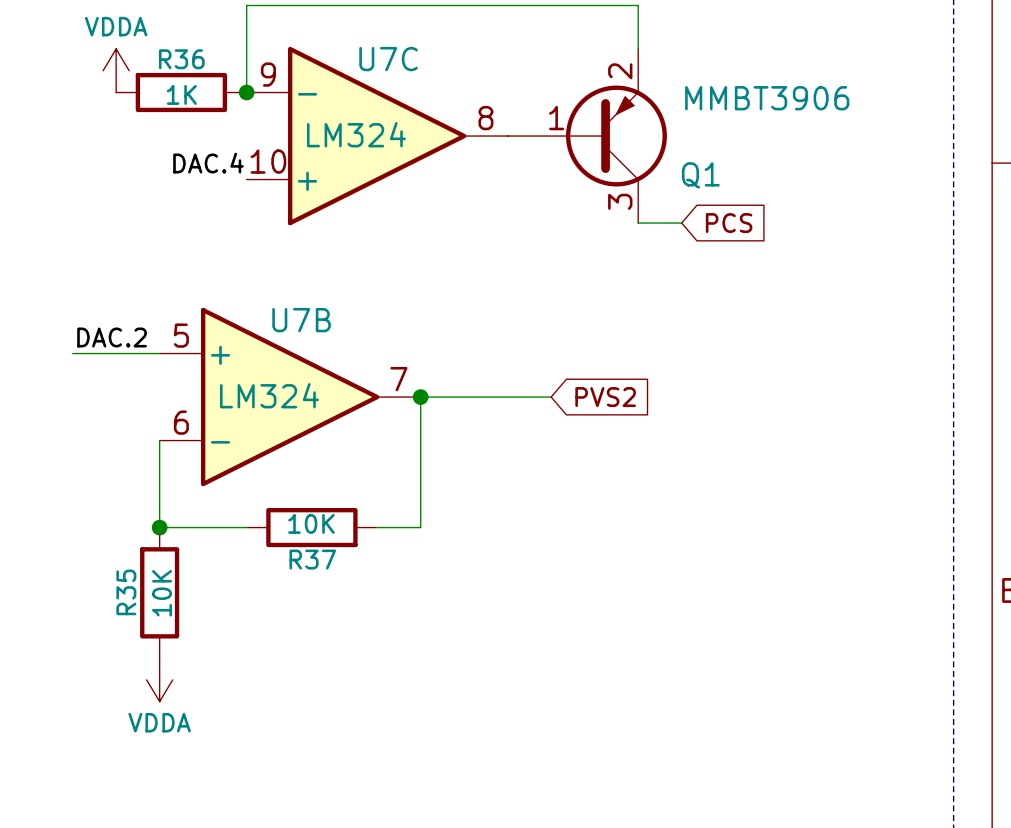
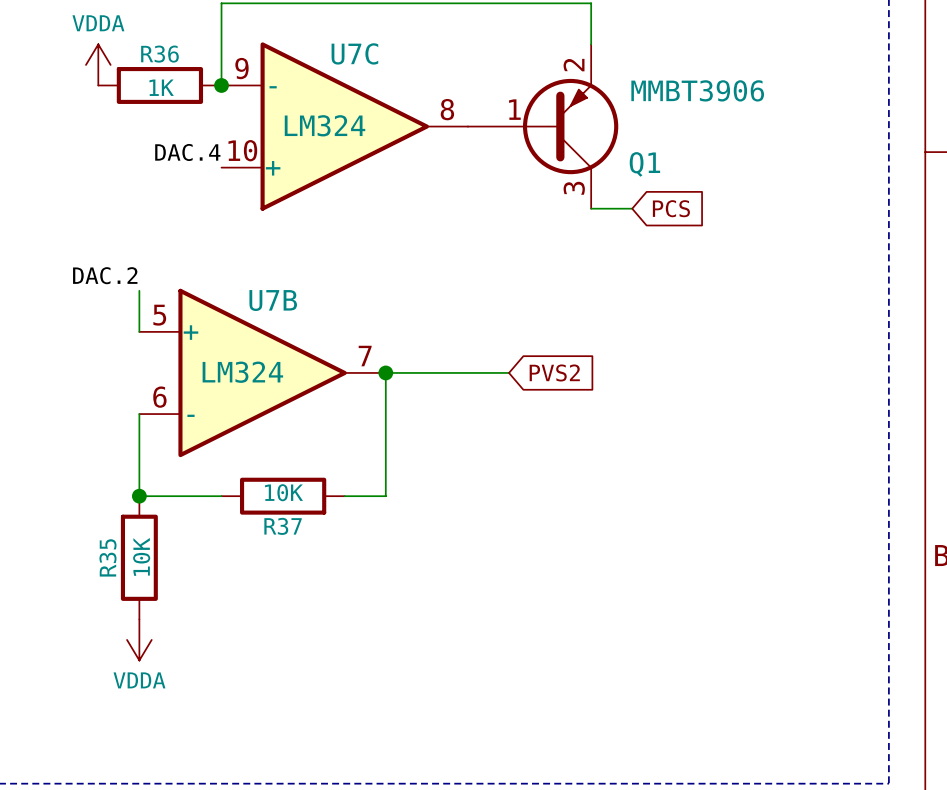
label position: DAC.2 (112, 337) -> DAC.2 (105, 275)
wire: (72, 353) (159, 353) -> (139, 290) (139, 331)

